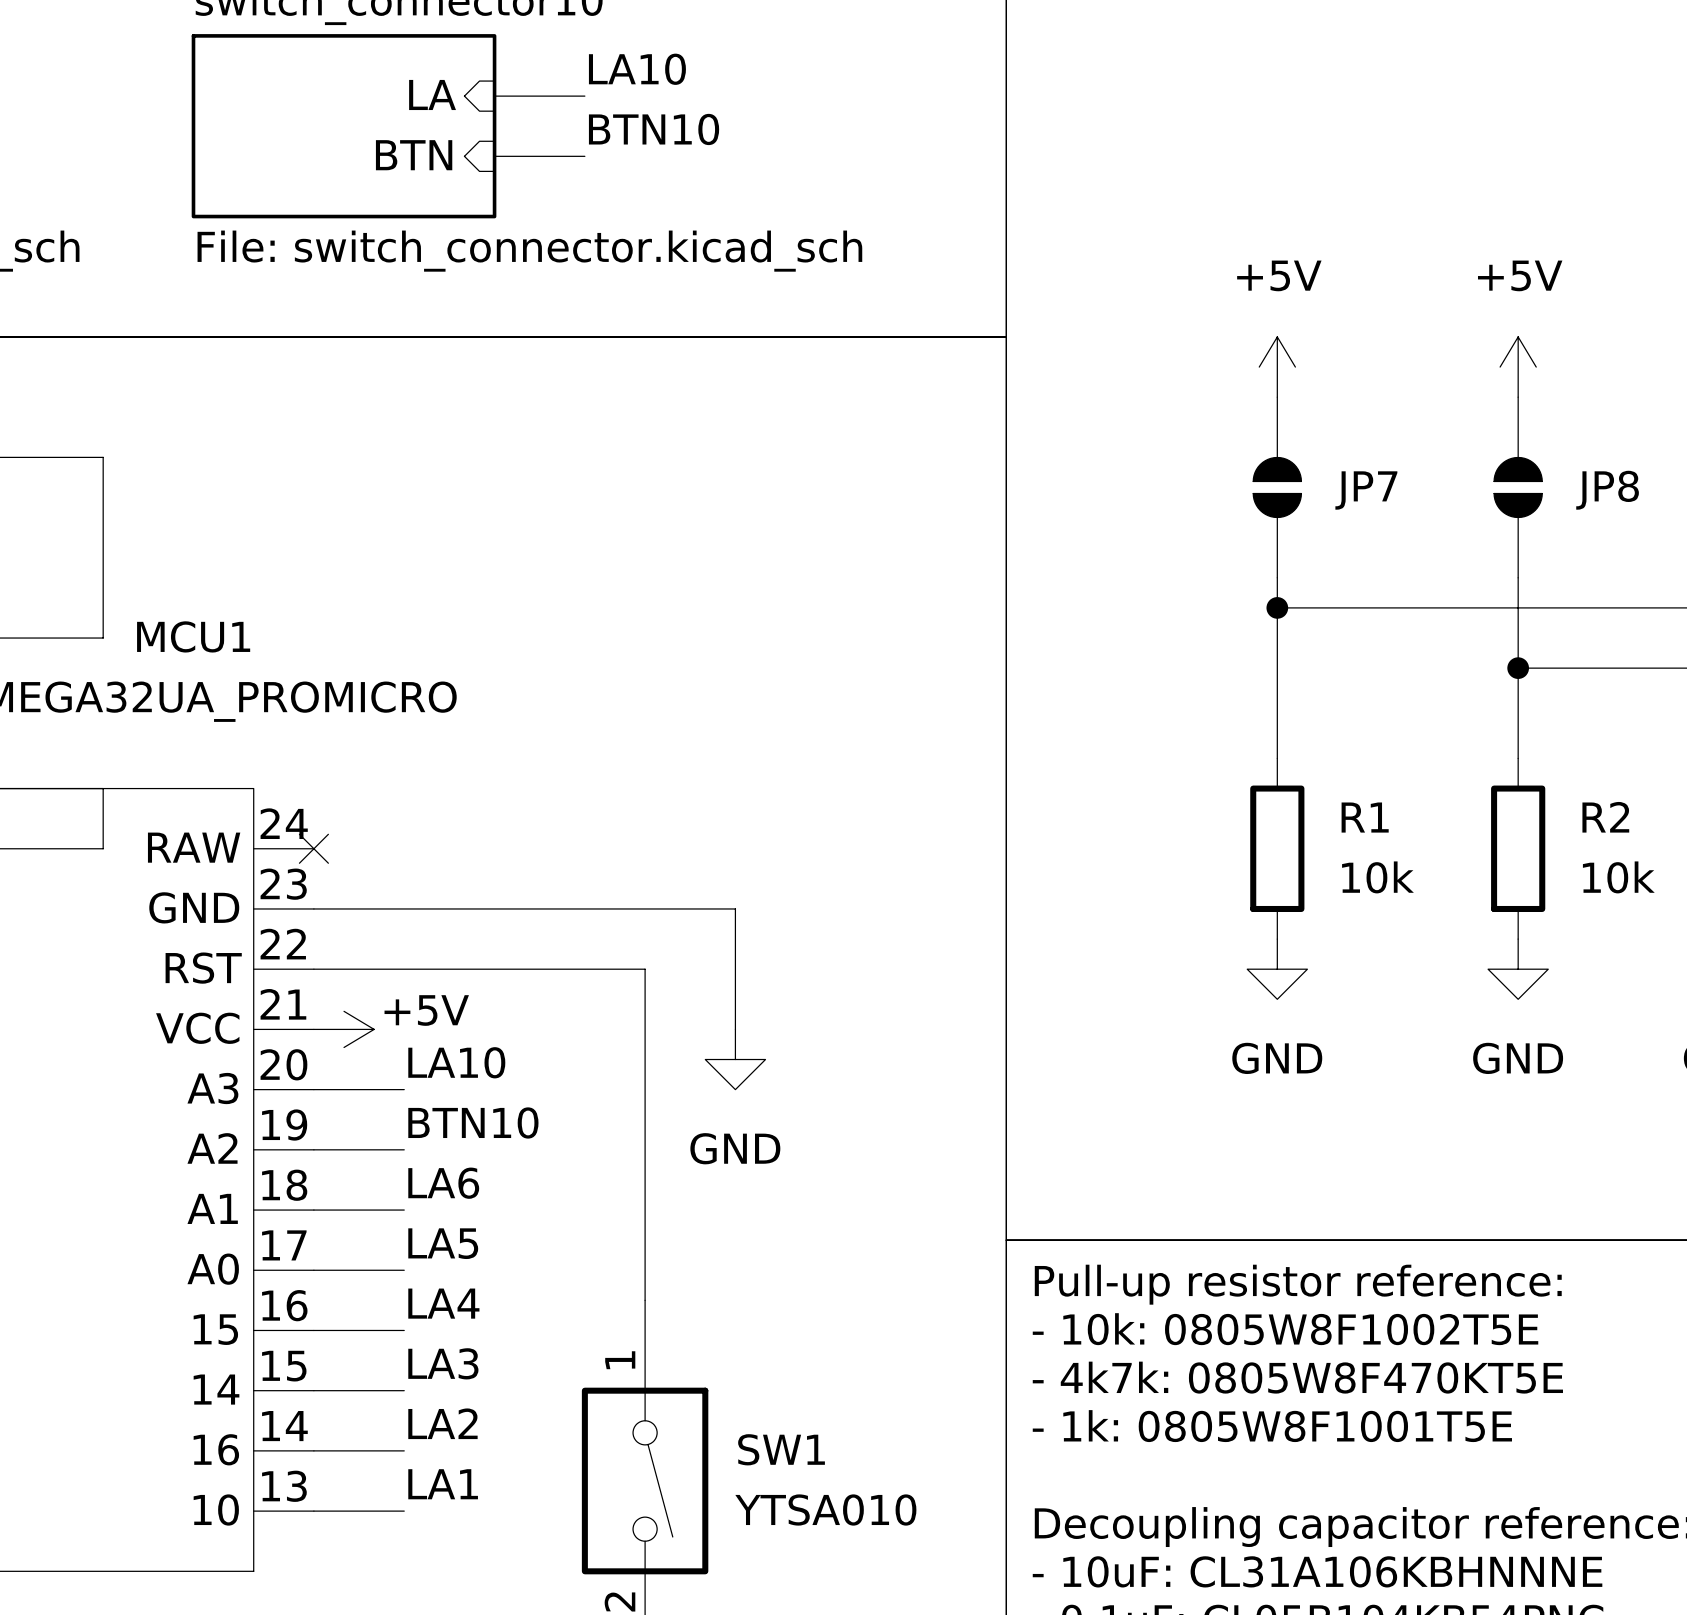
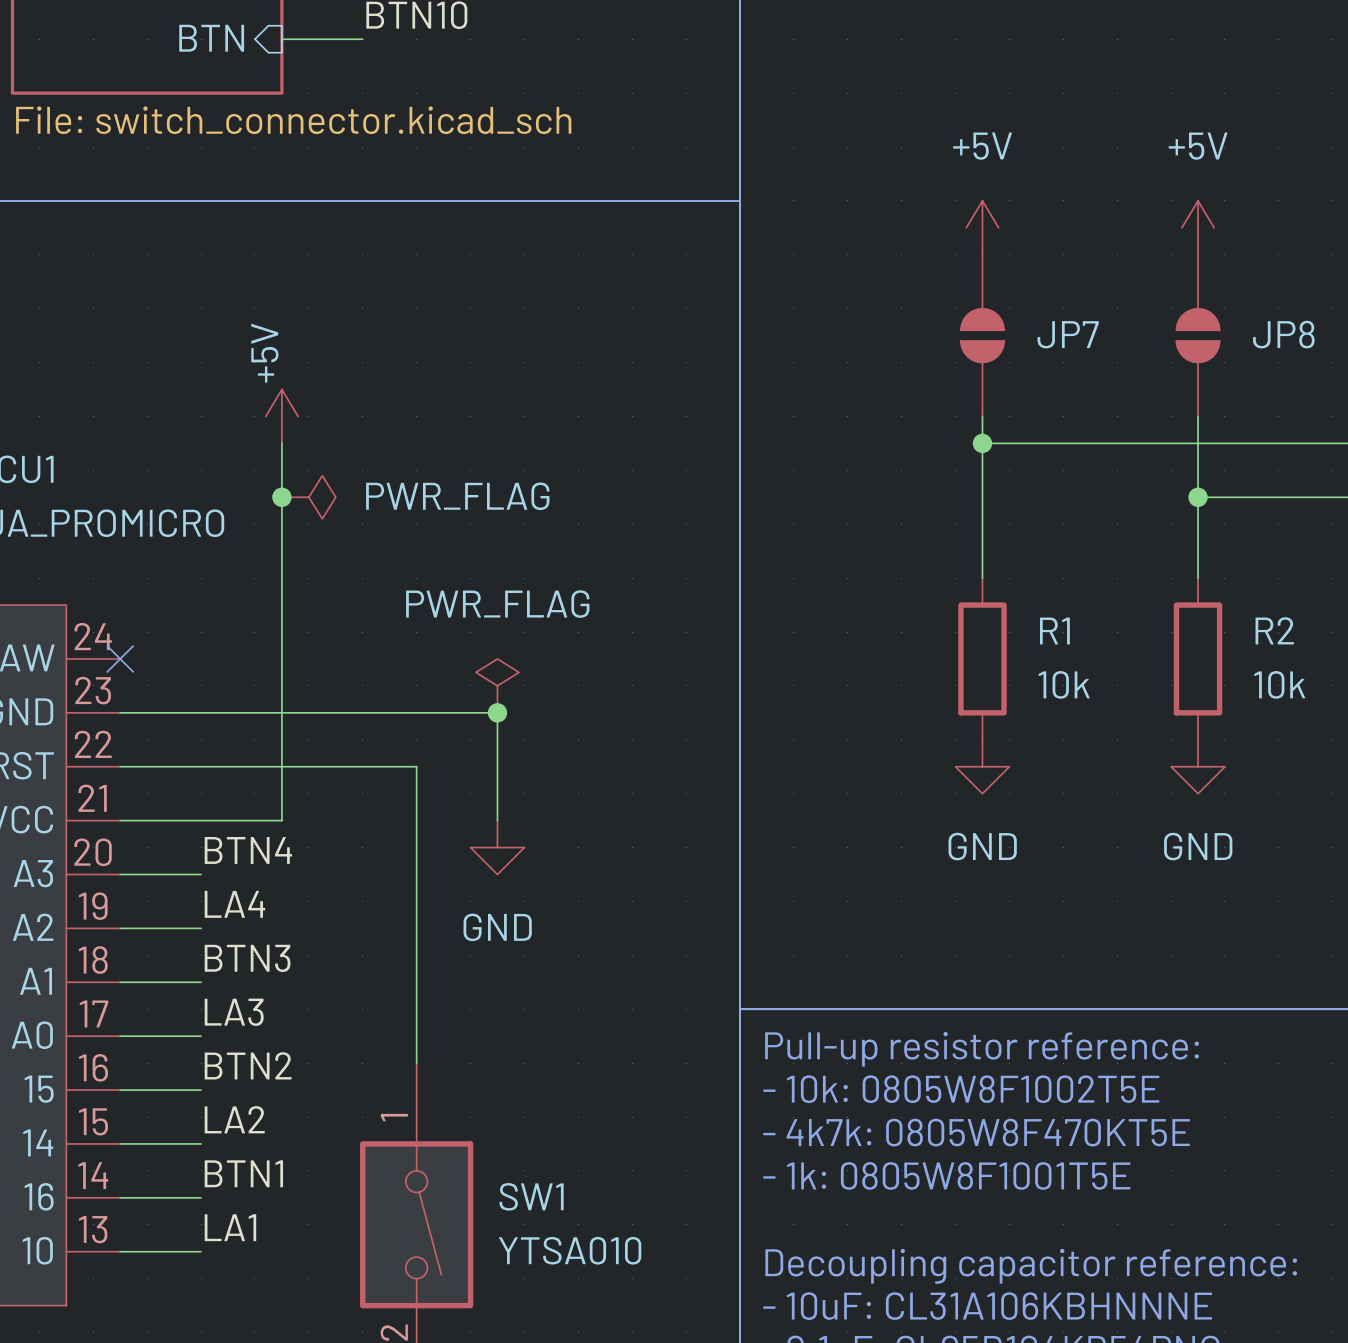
wire: none -> (281, 443) (281, 820) (120, 820)
junction: none -> (281, 497)
power symbol: none -> PWR_FLAG (308, 497)
power symbol: none -> PWR_FLAG (497, 685)
junction: none -> (497, 712)
power symbol rotation: 0° (344, 1029) -> 90° counterclockwise (281, 416)
power symbol position: +5V (344, 1029) -> +5V (281, 416)
label: LA10 (456, 1062) -> BTN4 (248, 850)
label: BTN10 (473, 1122) -> LA4 (234, 904)
label: LA6 (443, 1183) -> BTN3 (247, 958)
label: LA5 (443, 1243) -> LA3 (234, 1012)
label: LA4 (443, 1303) -> BTN2 (248, 1065)
label: LA3 (443, 1363) -> LA2 (234, 1119)
label: LA2 (442, 1423) -> BTN1 (243, 1173)

